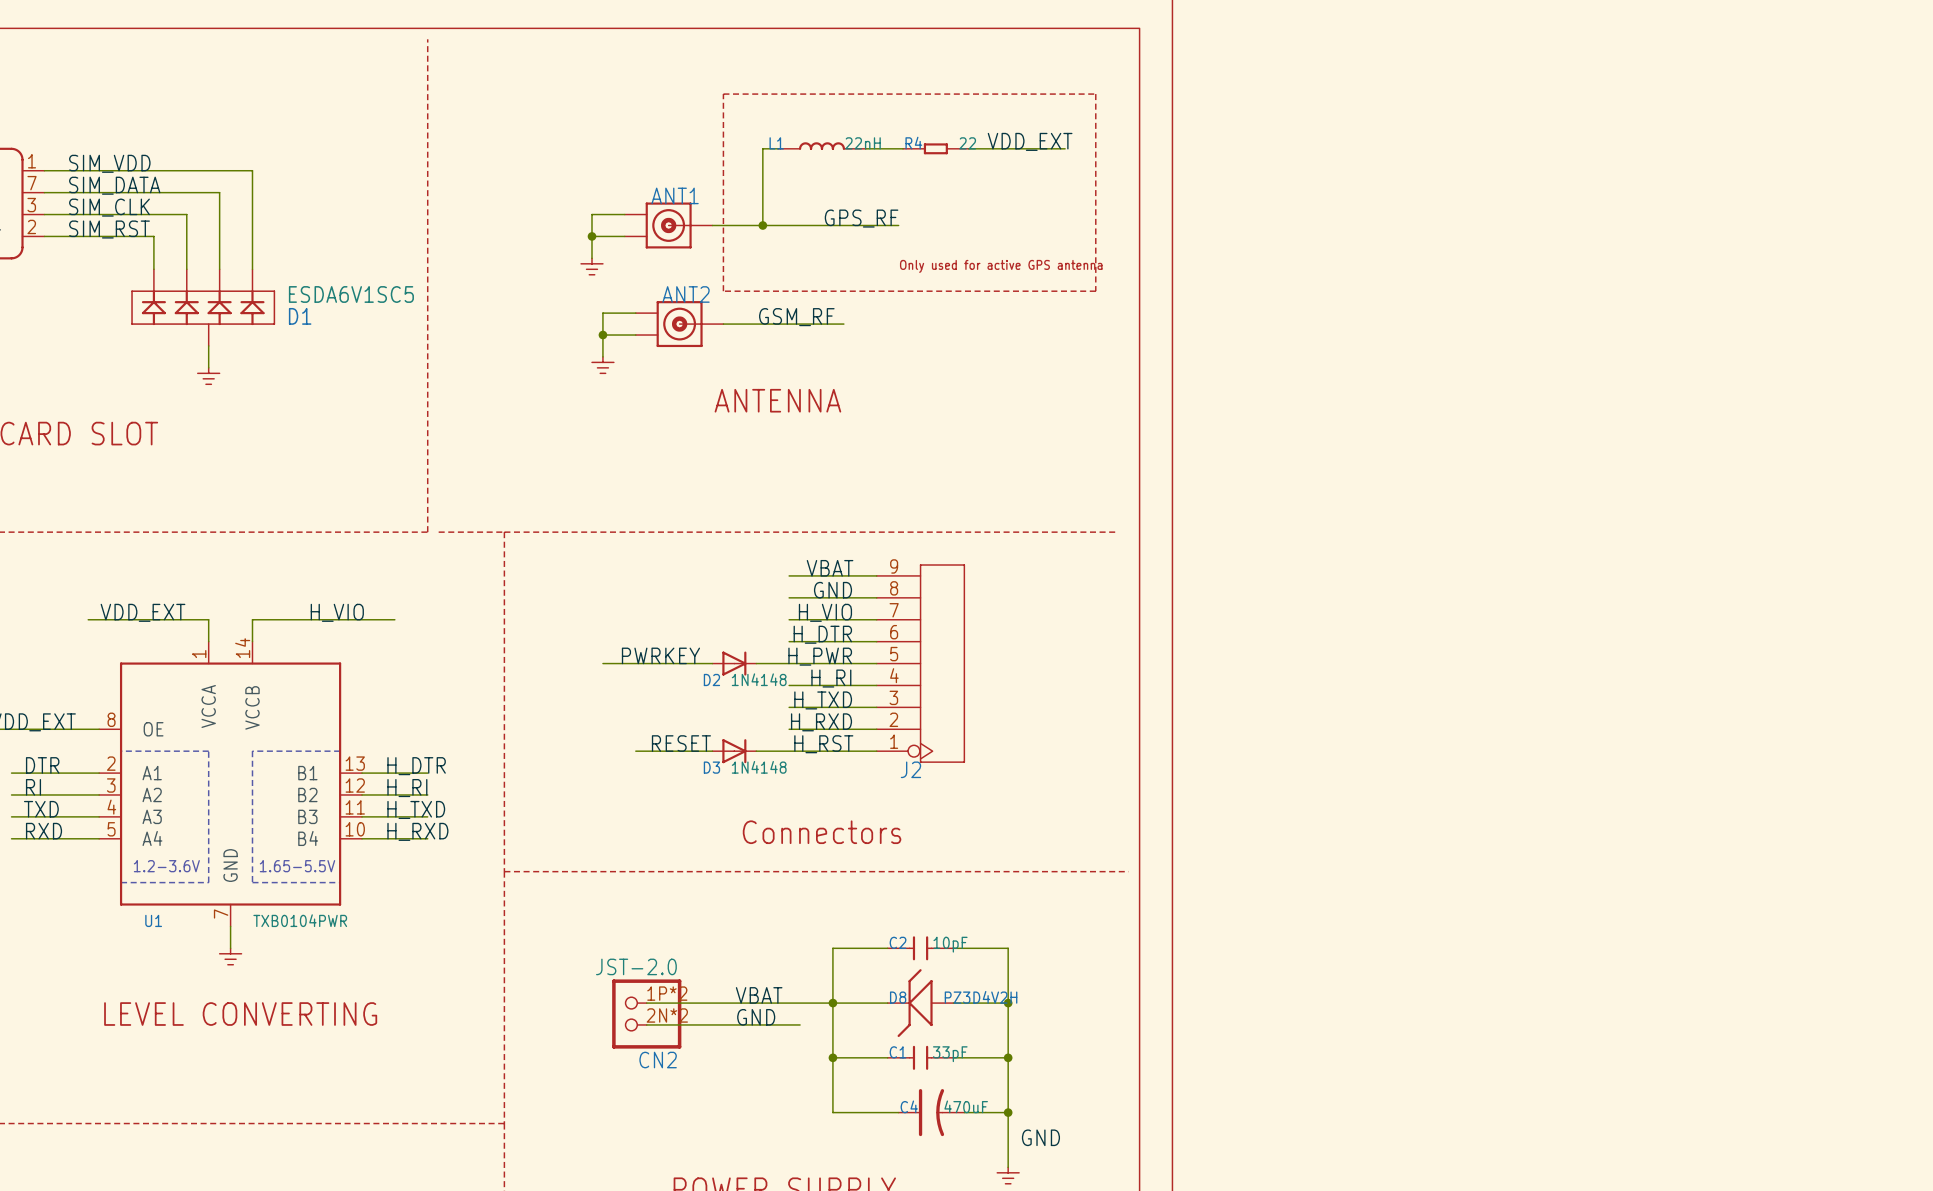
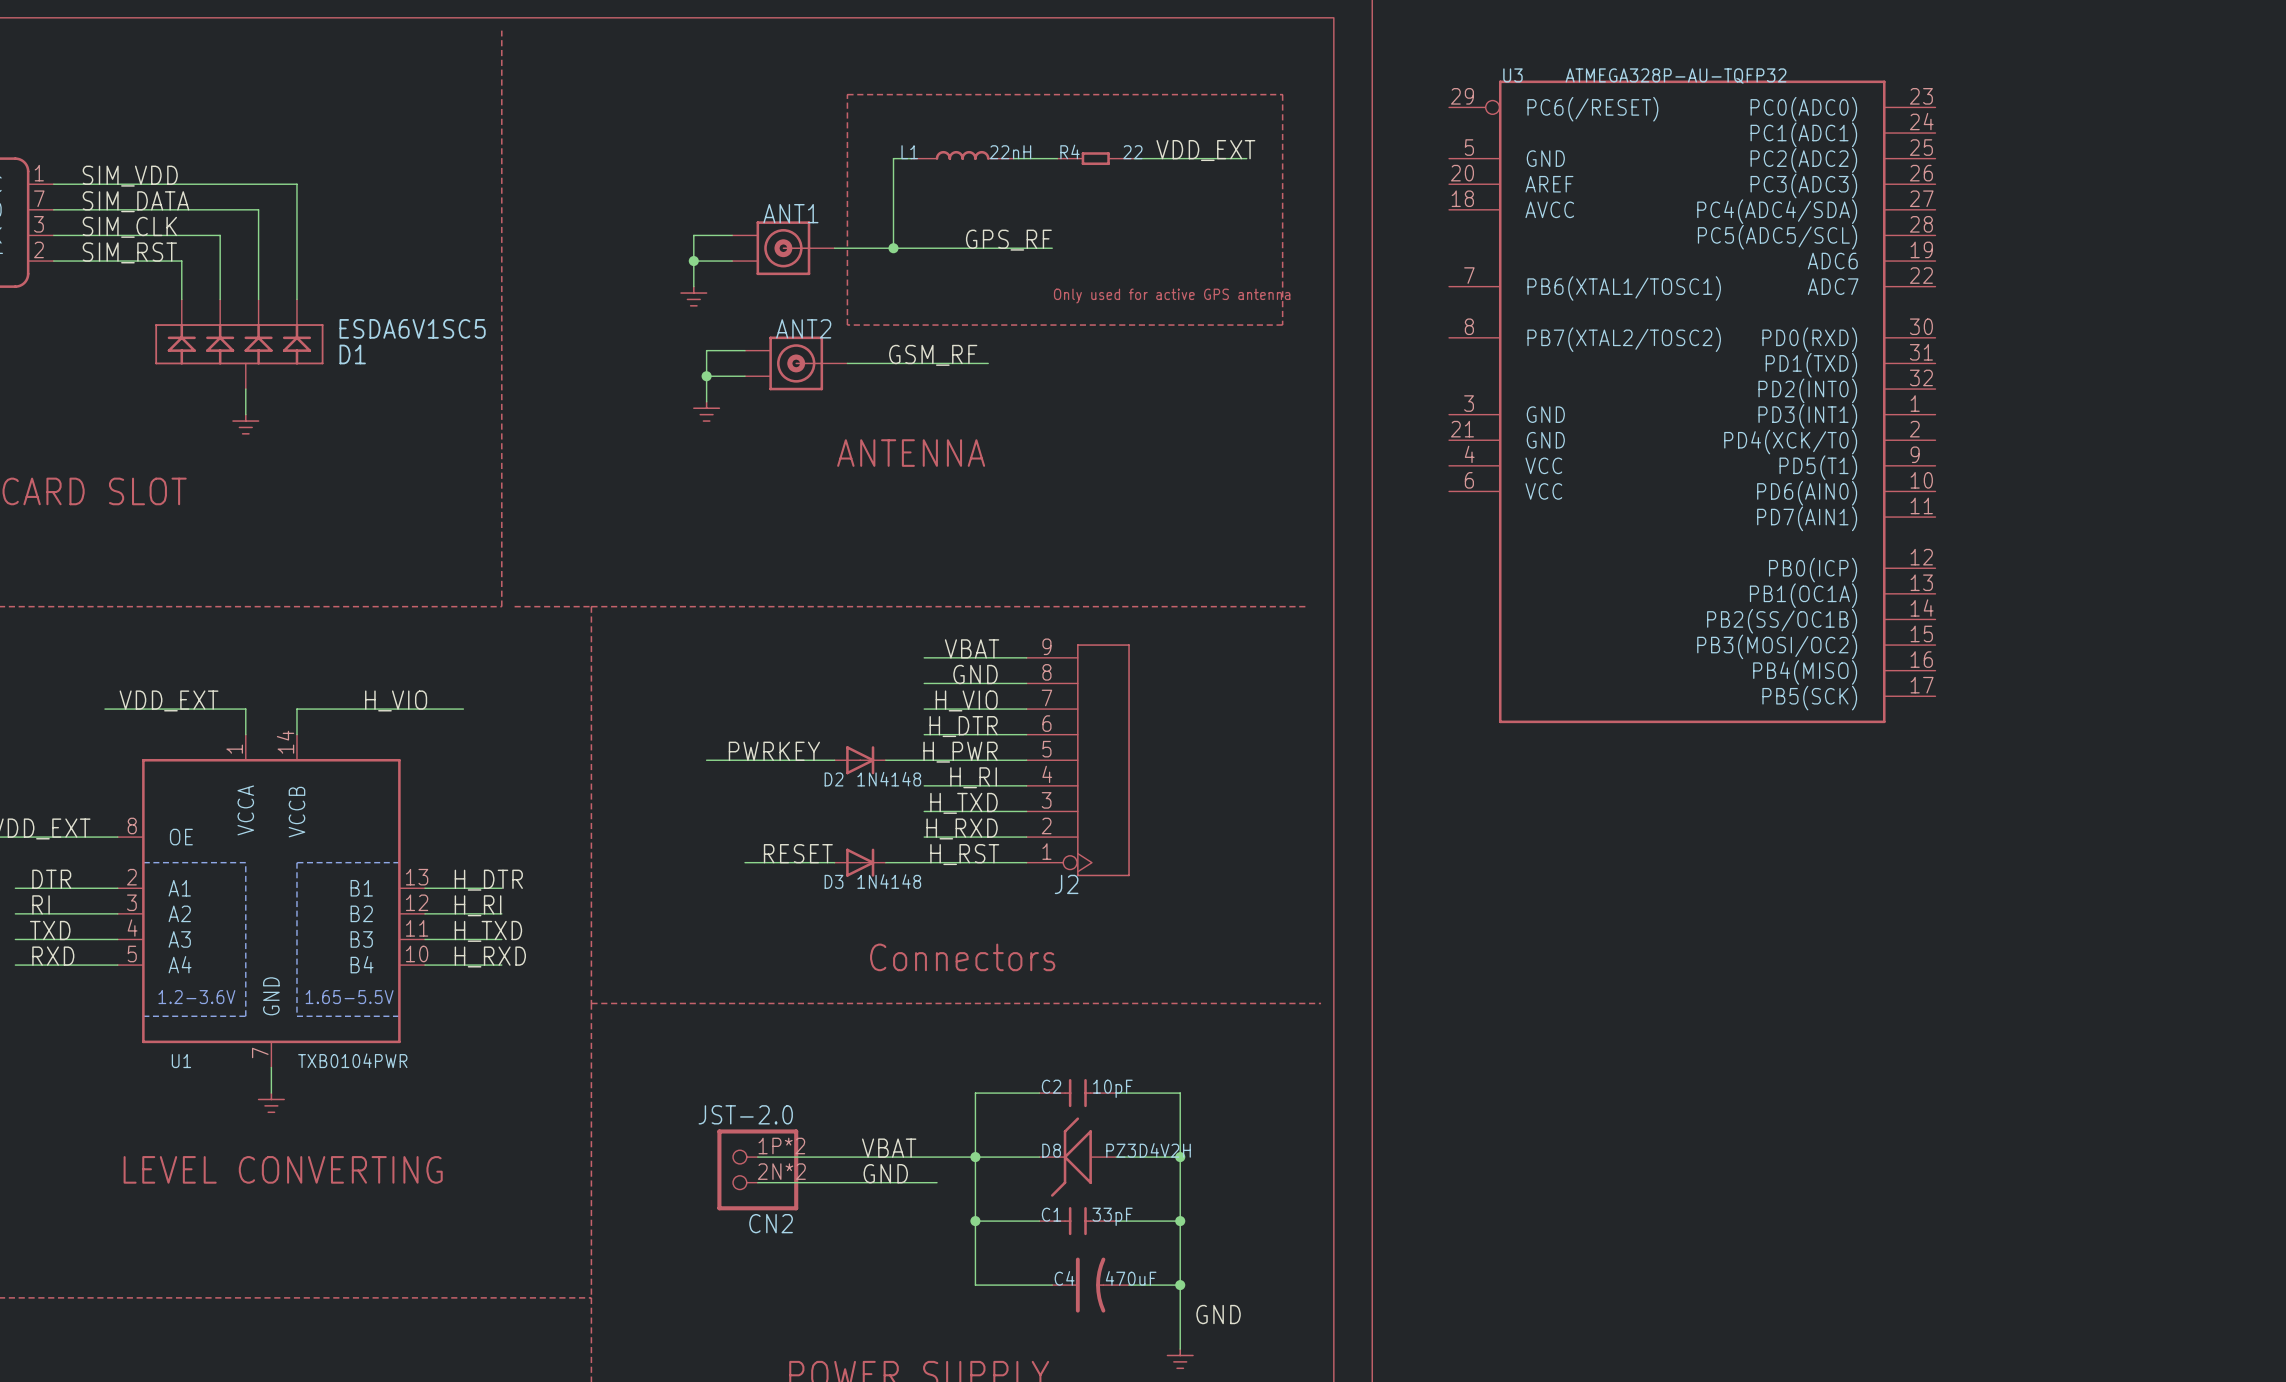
U3: none -> ATMEGA328P-AU-TQFP32 (1692, 401)

